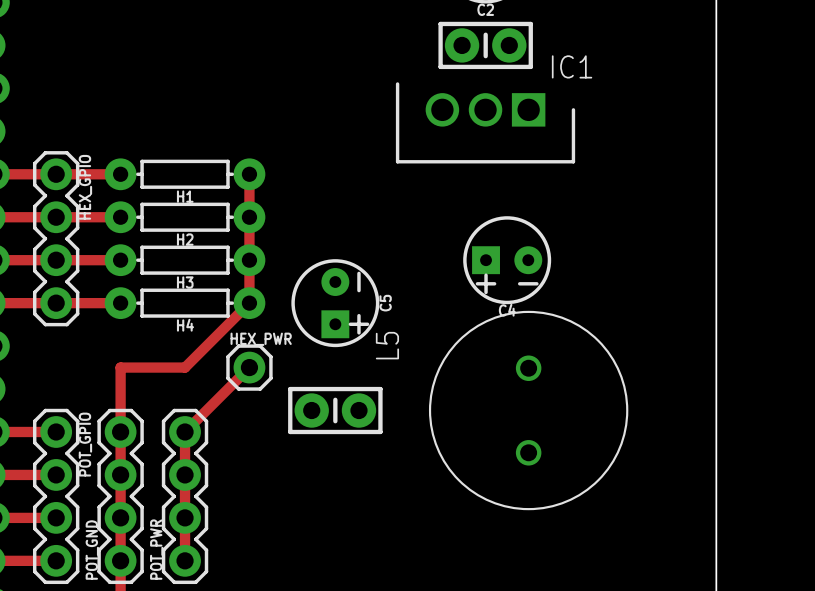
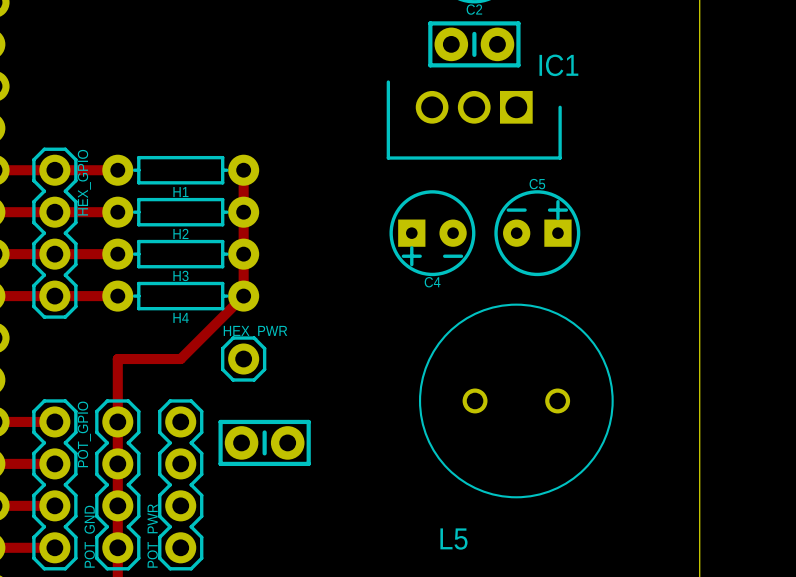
C4 position: (507, 260) -> (432, 233)
C5 rotation: 0° (335, 303) -> 90° counterclockwise (537, 233)
C5 position: (335, 303) -> (537, 233)
L5 name position: L5 (387, 345) -> L5 (453, 539)
track: (249, 367) (185, 431) (185, 560) -> none
part position: (335, 410) -> (264, 442)
L5 rotation: 0° (528, 410) -> 90° clockwise (516, 400)

